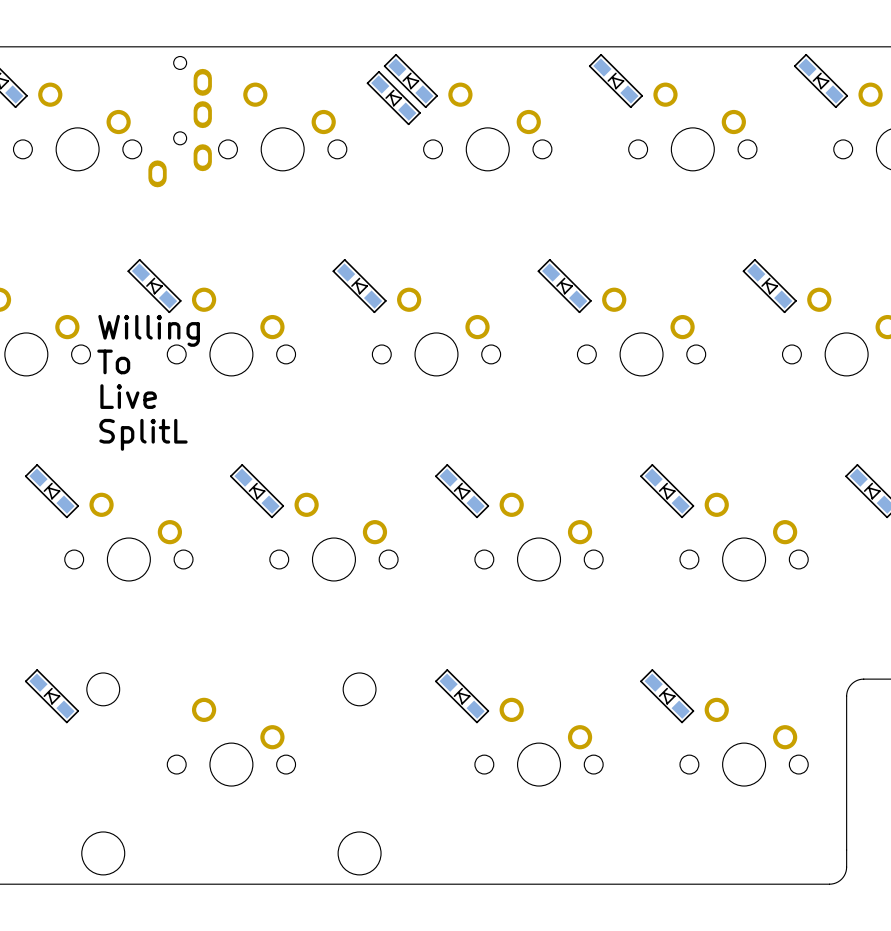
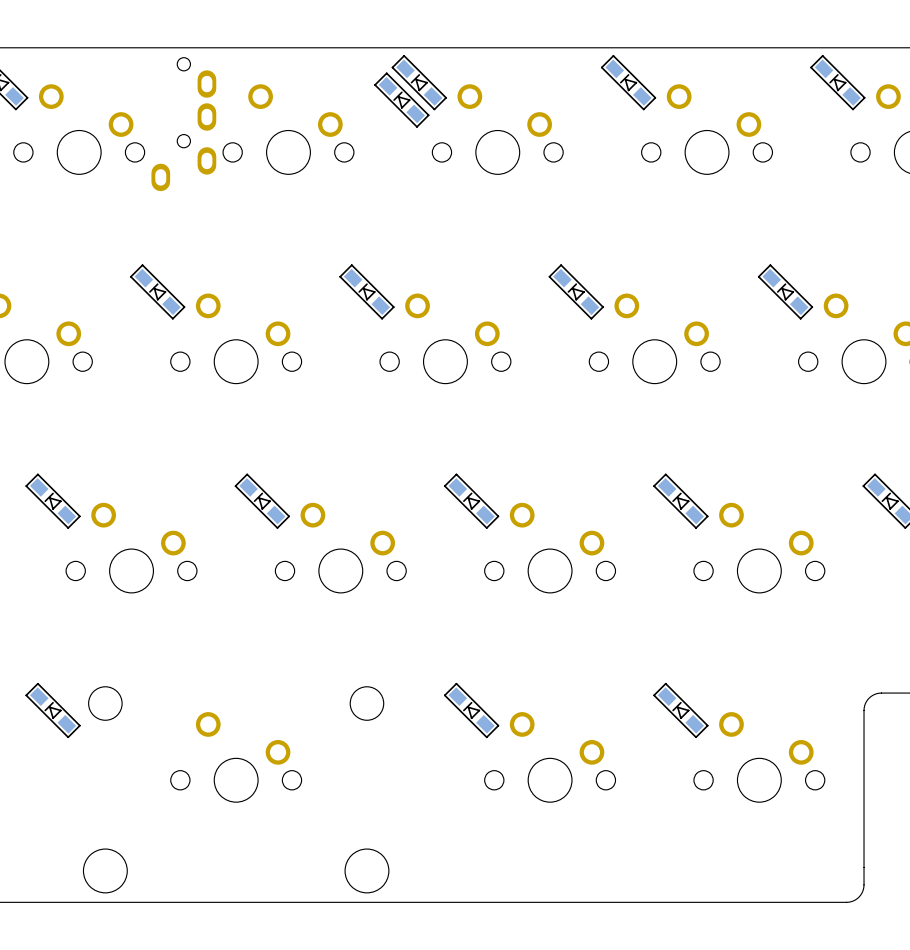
text: Willing (149, 330) -> none
text: To (113, 361) -> none
text: Live (128, 396) -> none
text: SplitL (143, 434) -> none

